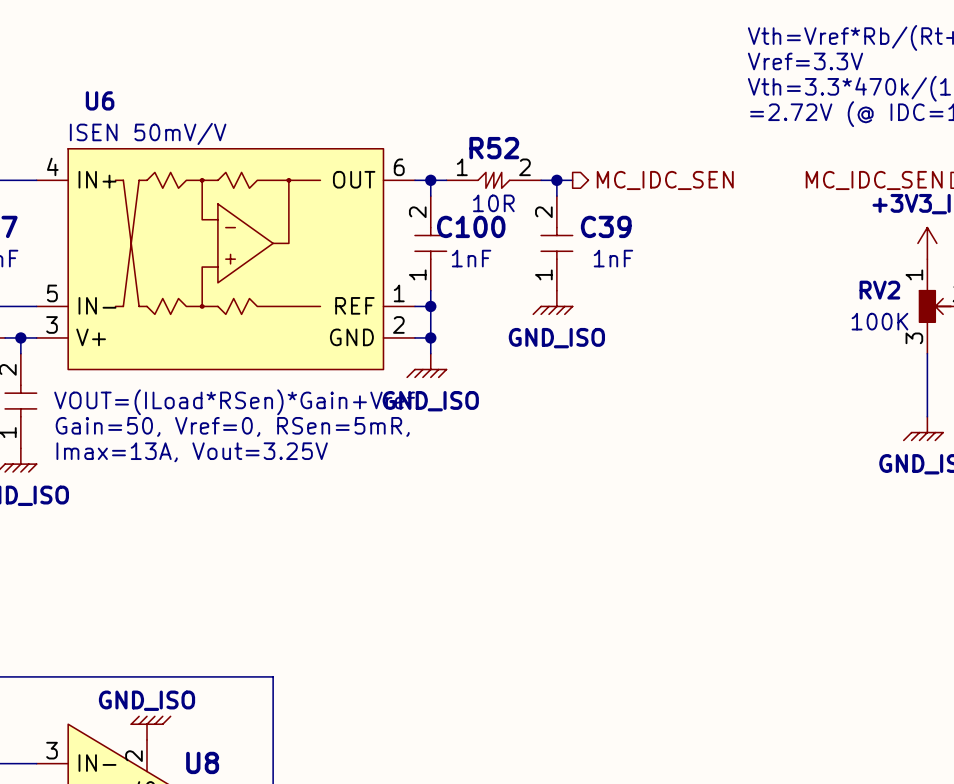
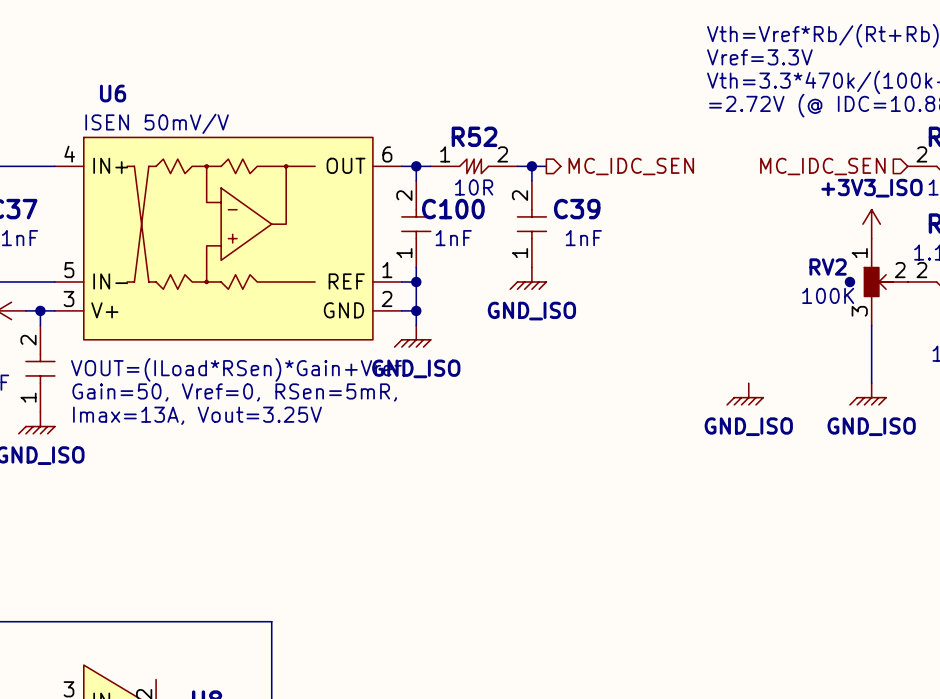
junction: none -> (849, 282)
power symbol: none -> GND_ISO (745, 394)
power symbol: GND_ISO (150, 728) -> none

